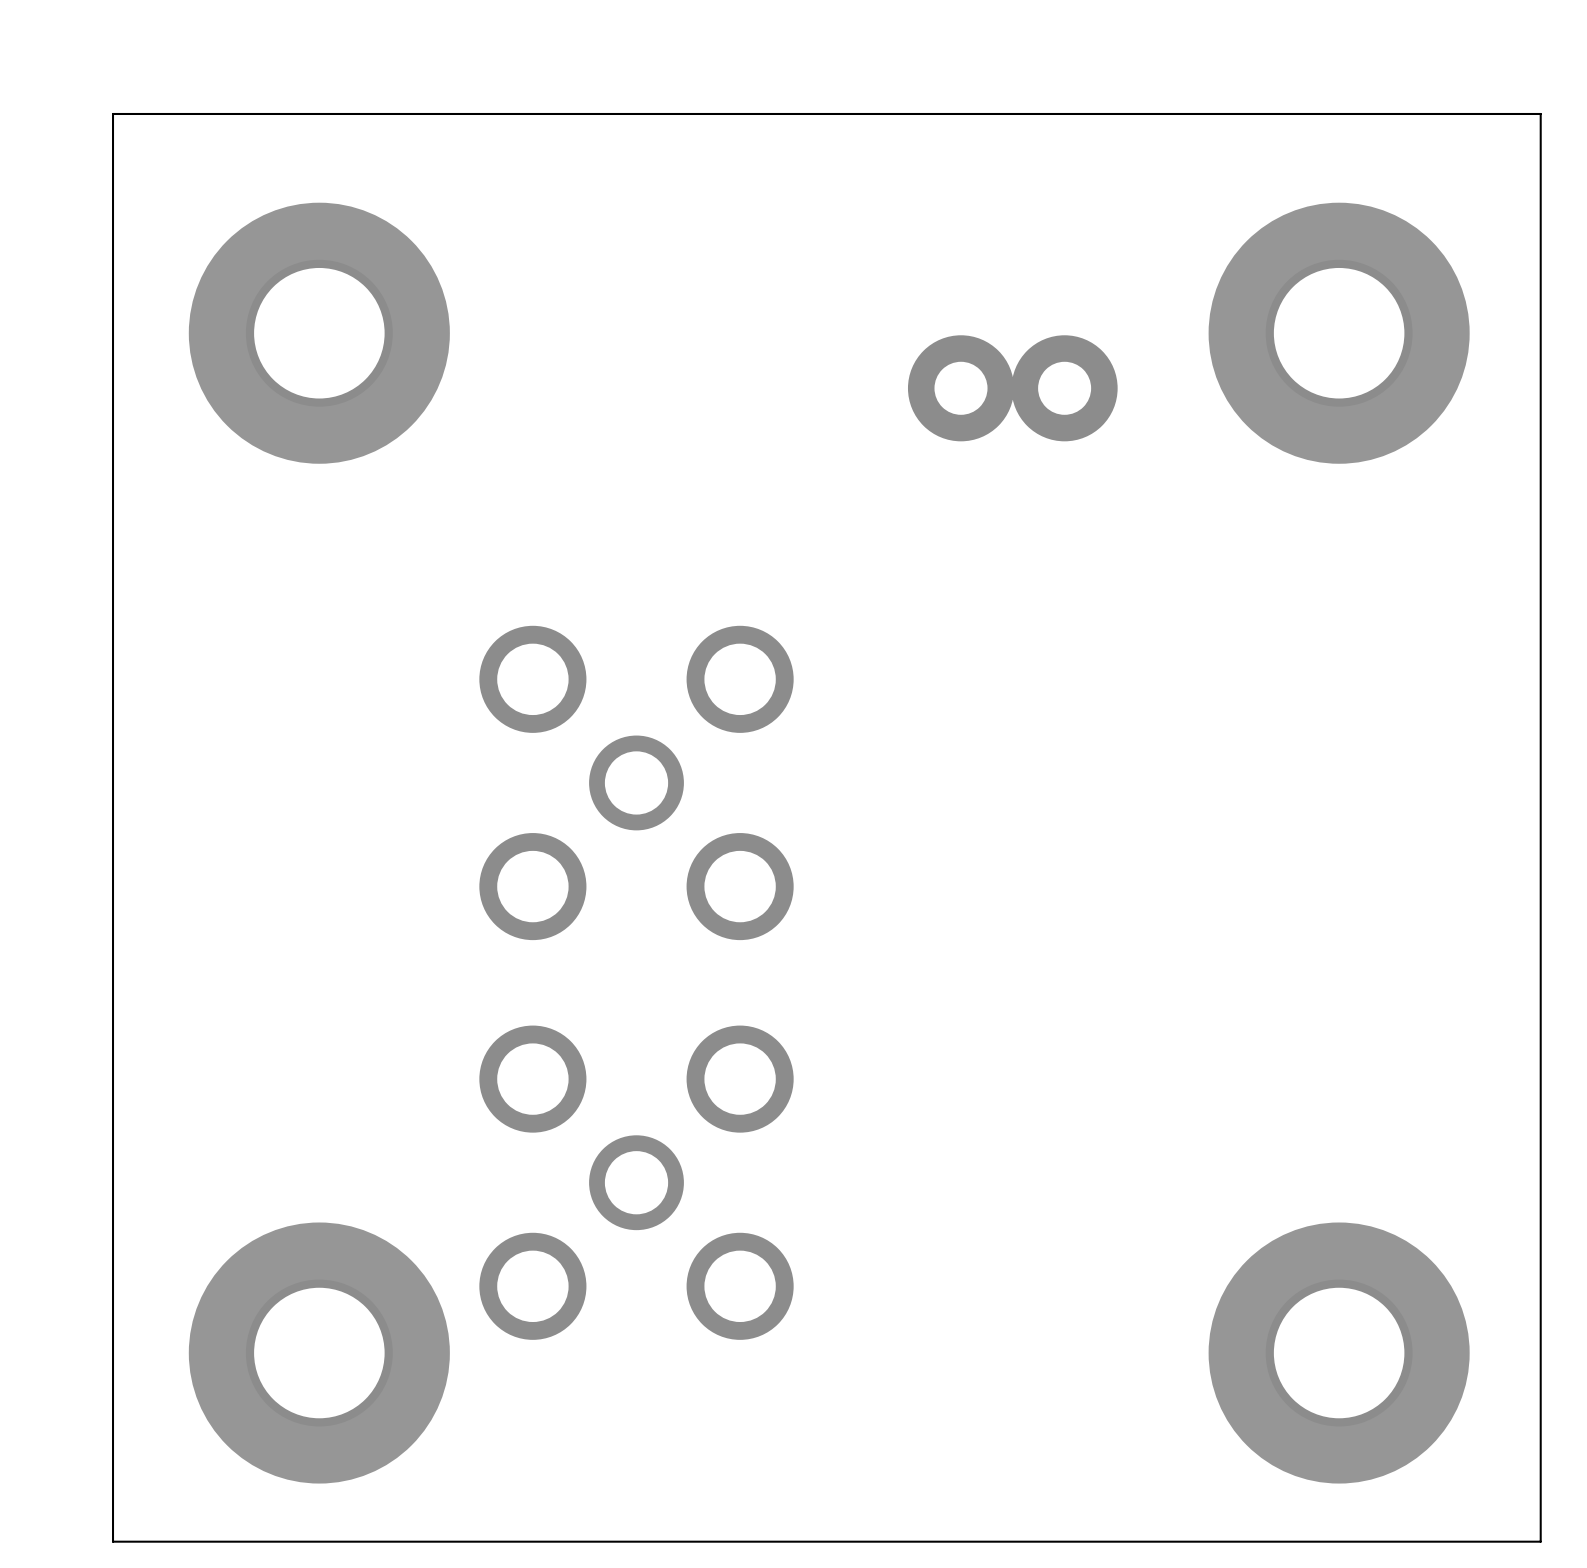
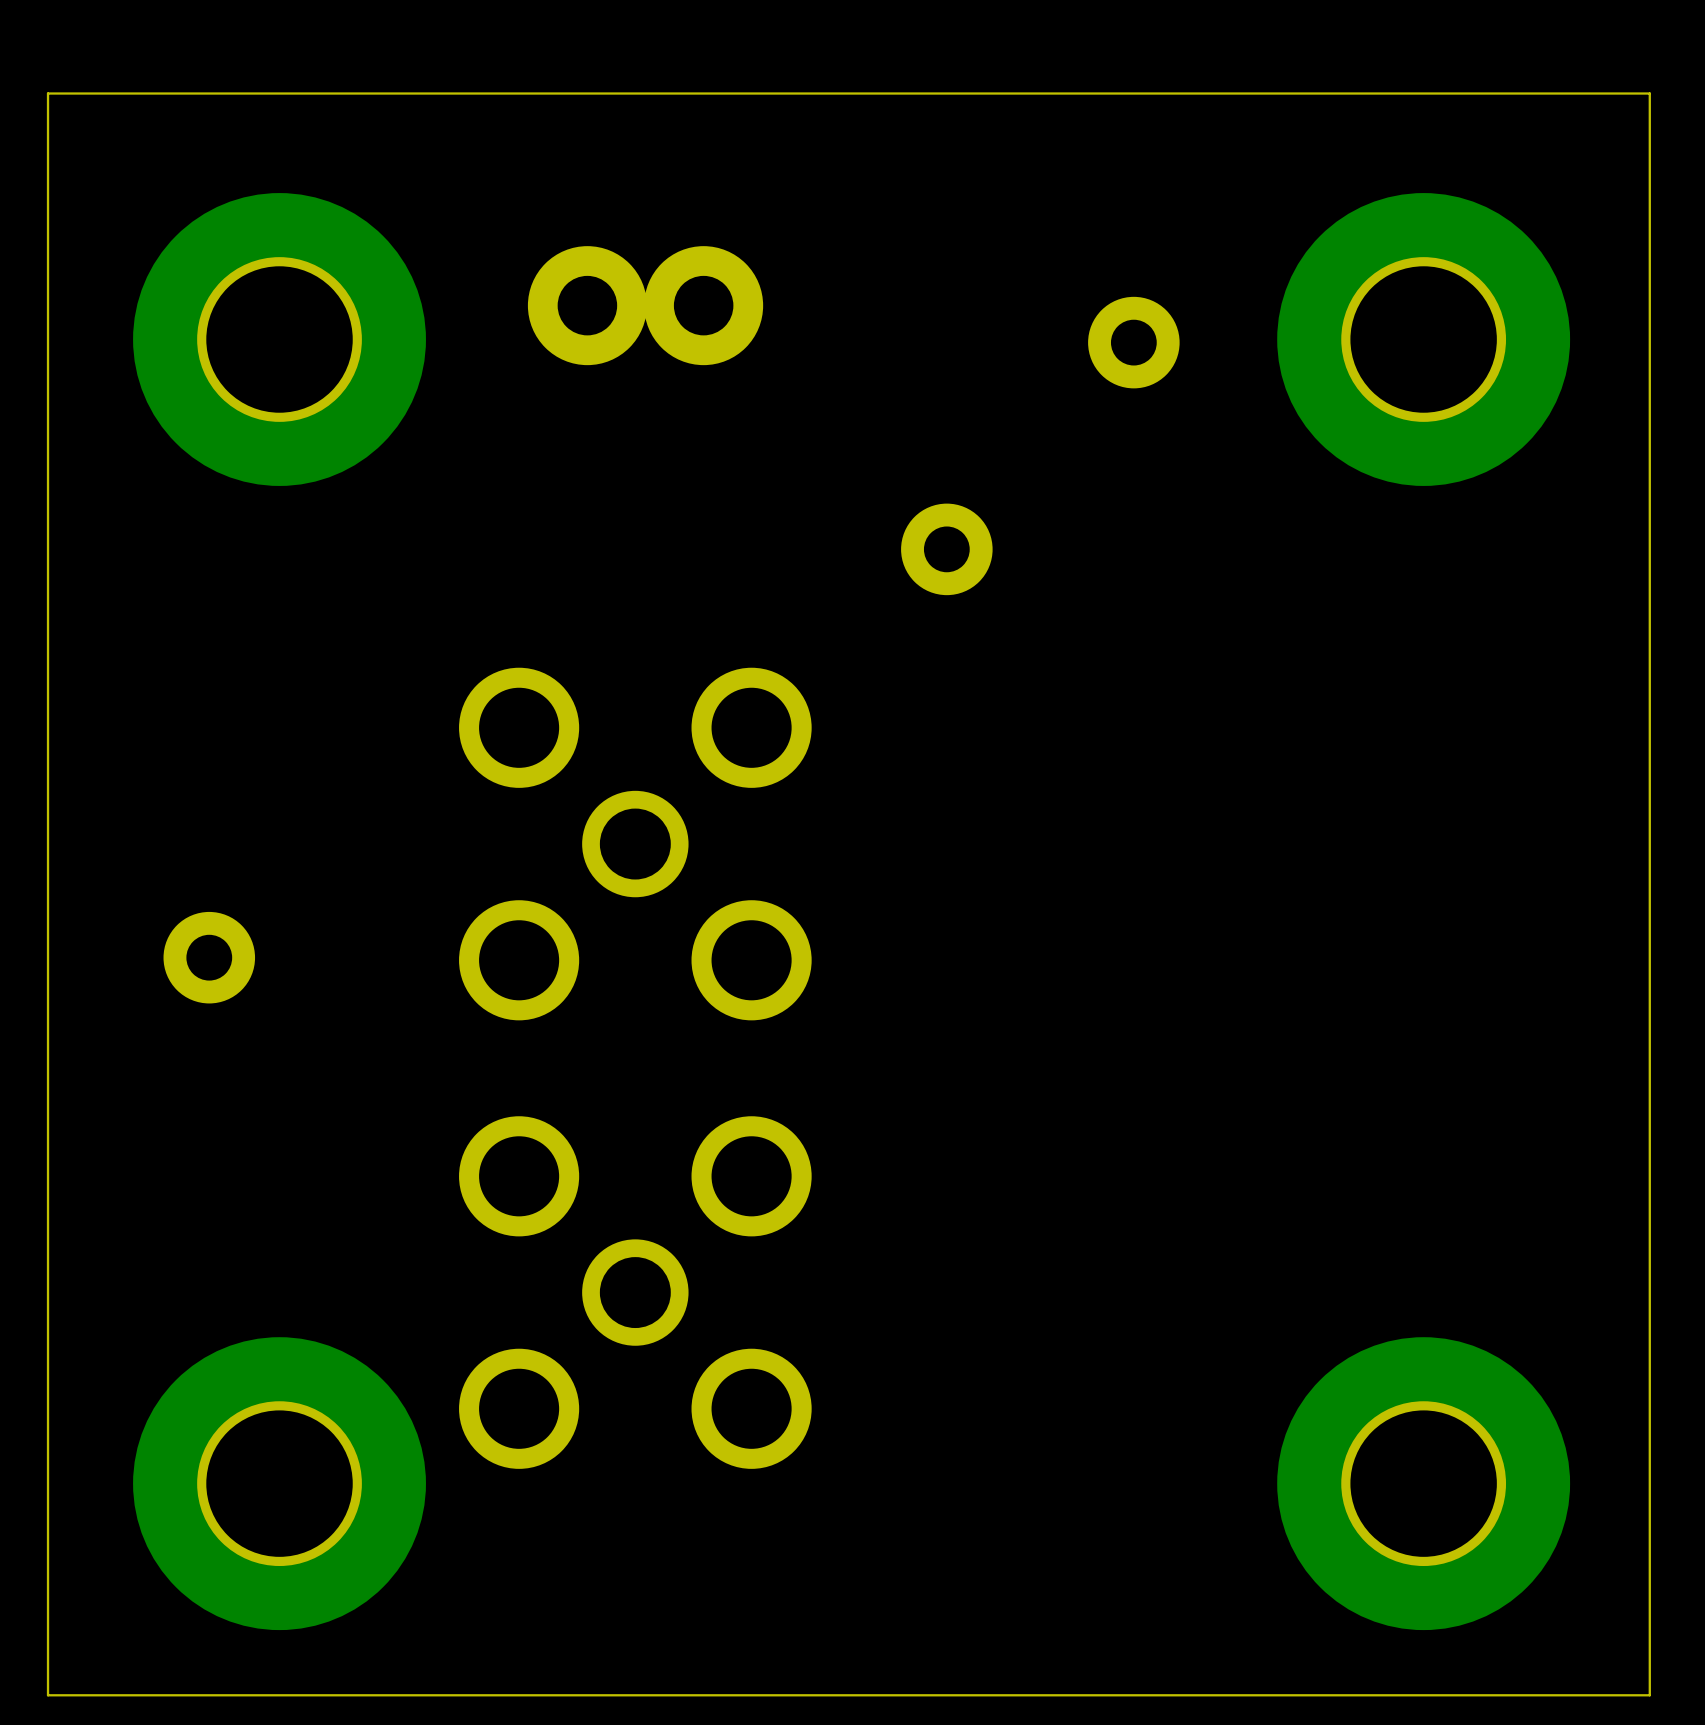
part: none -> (1133, 342)
part position: (1012, 388) -> (645, 305)
part: none -> (946, 549)
part: none -> (209, 957)

